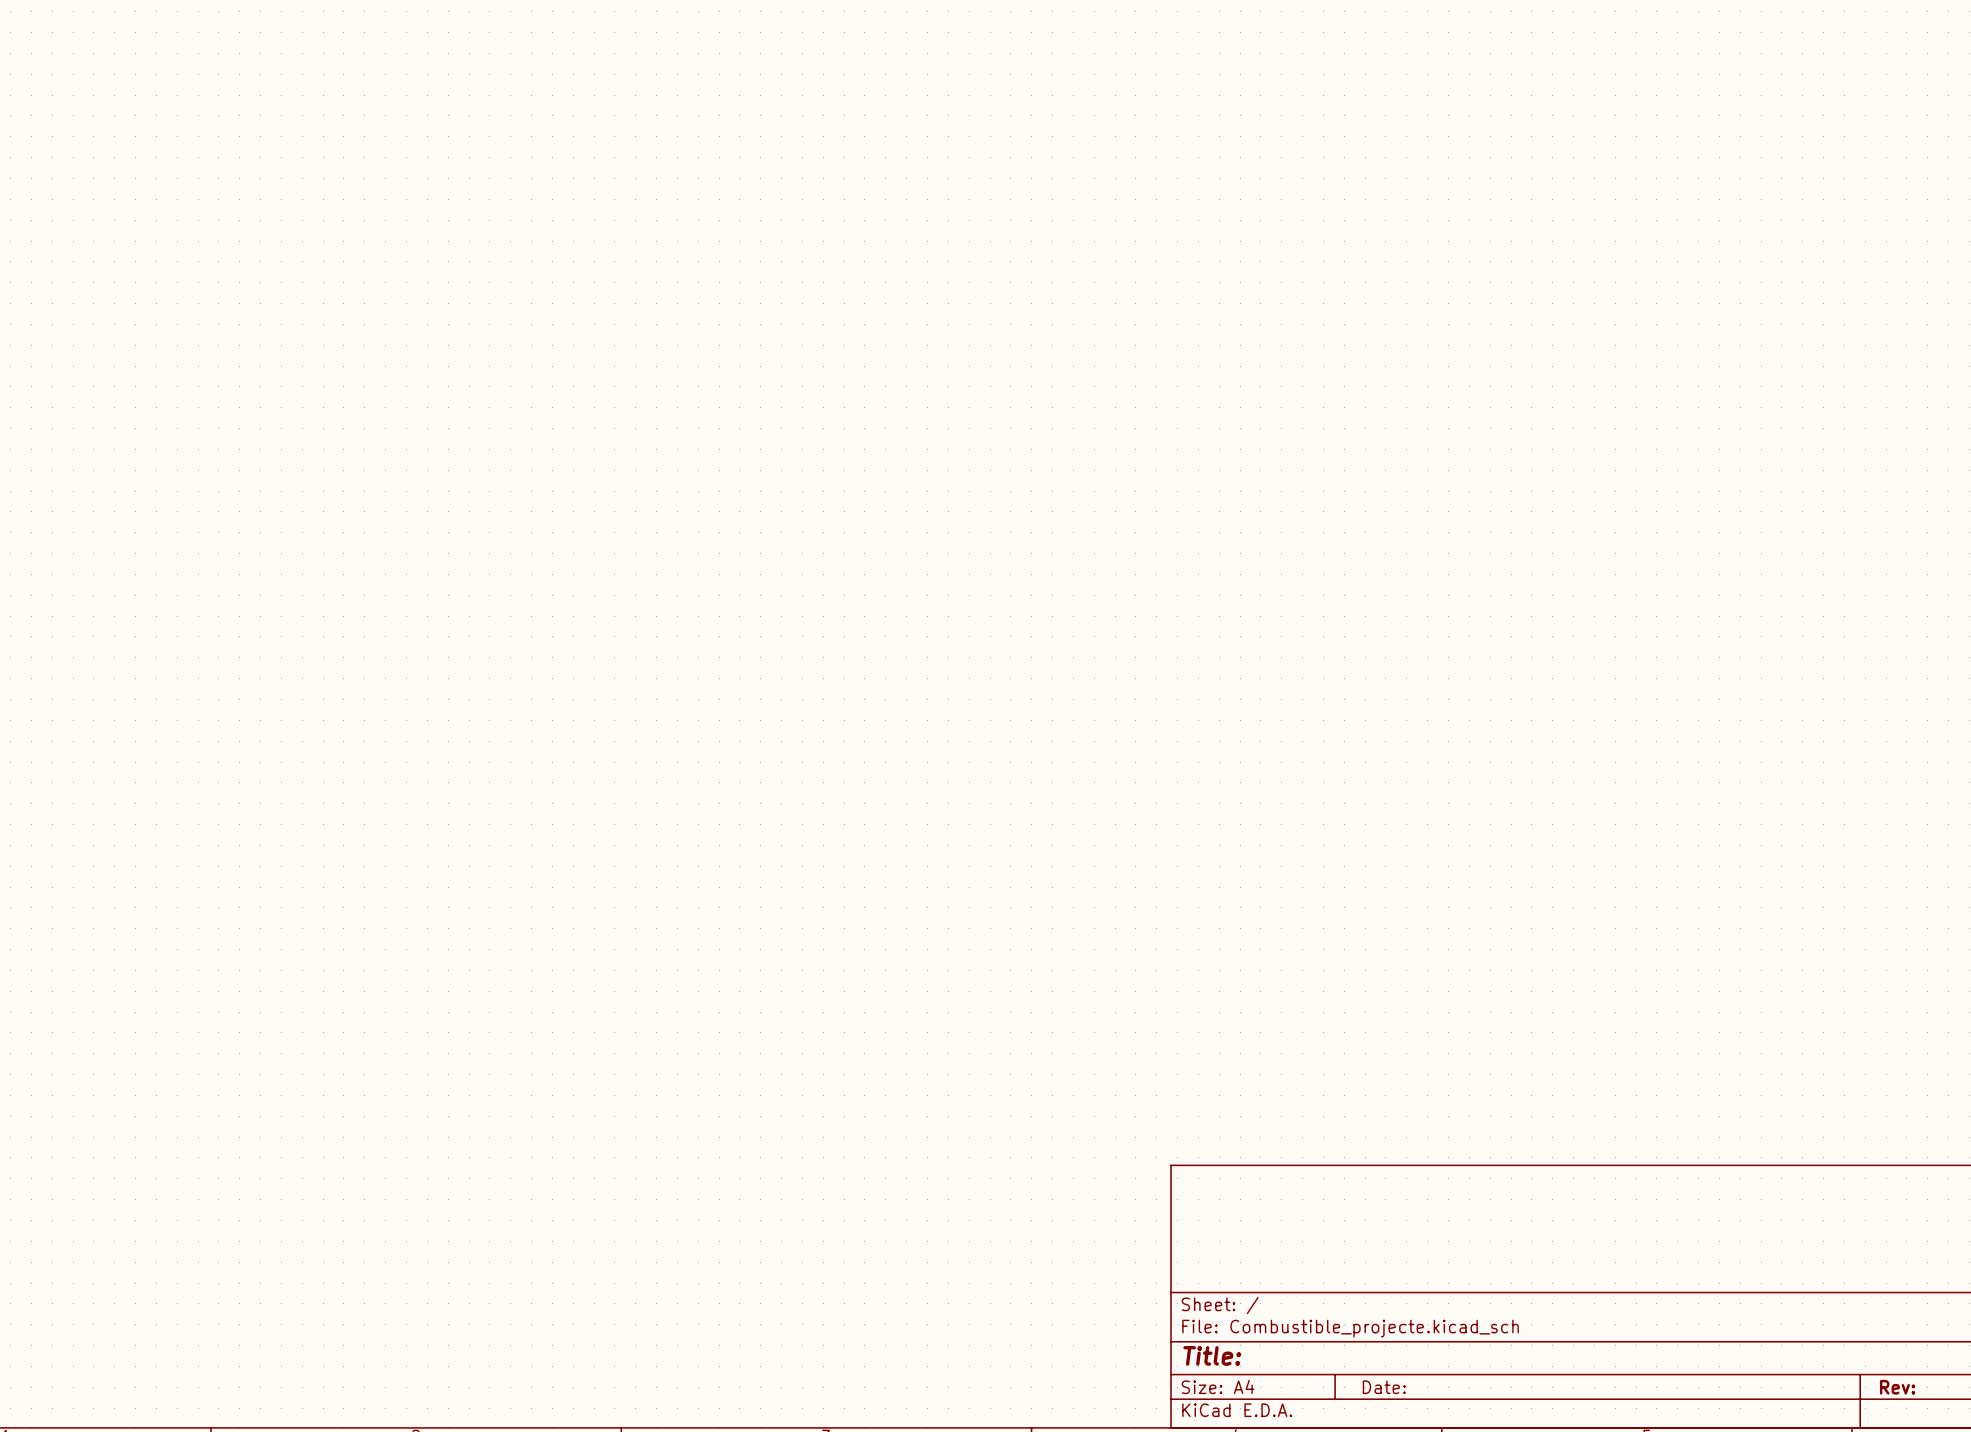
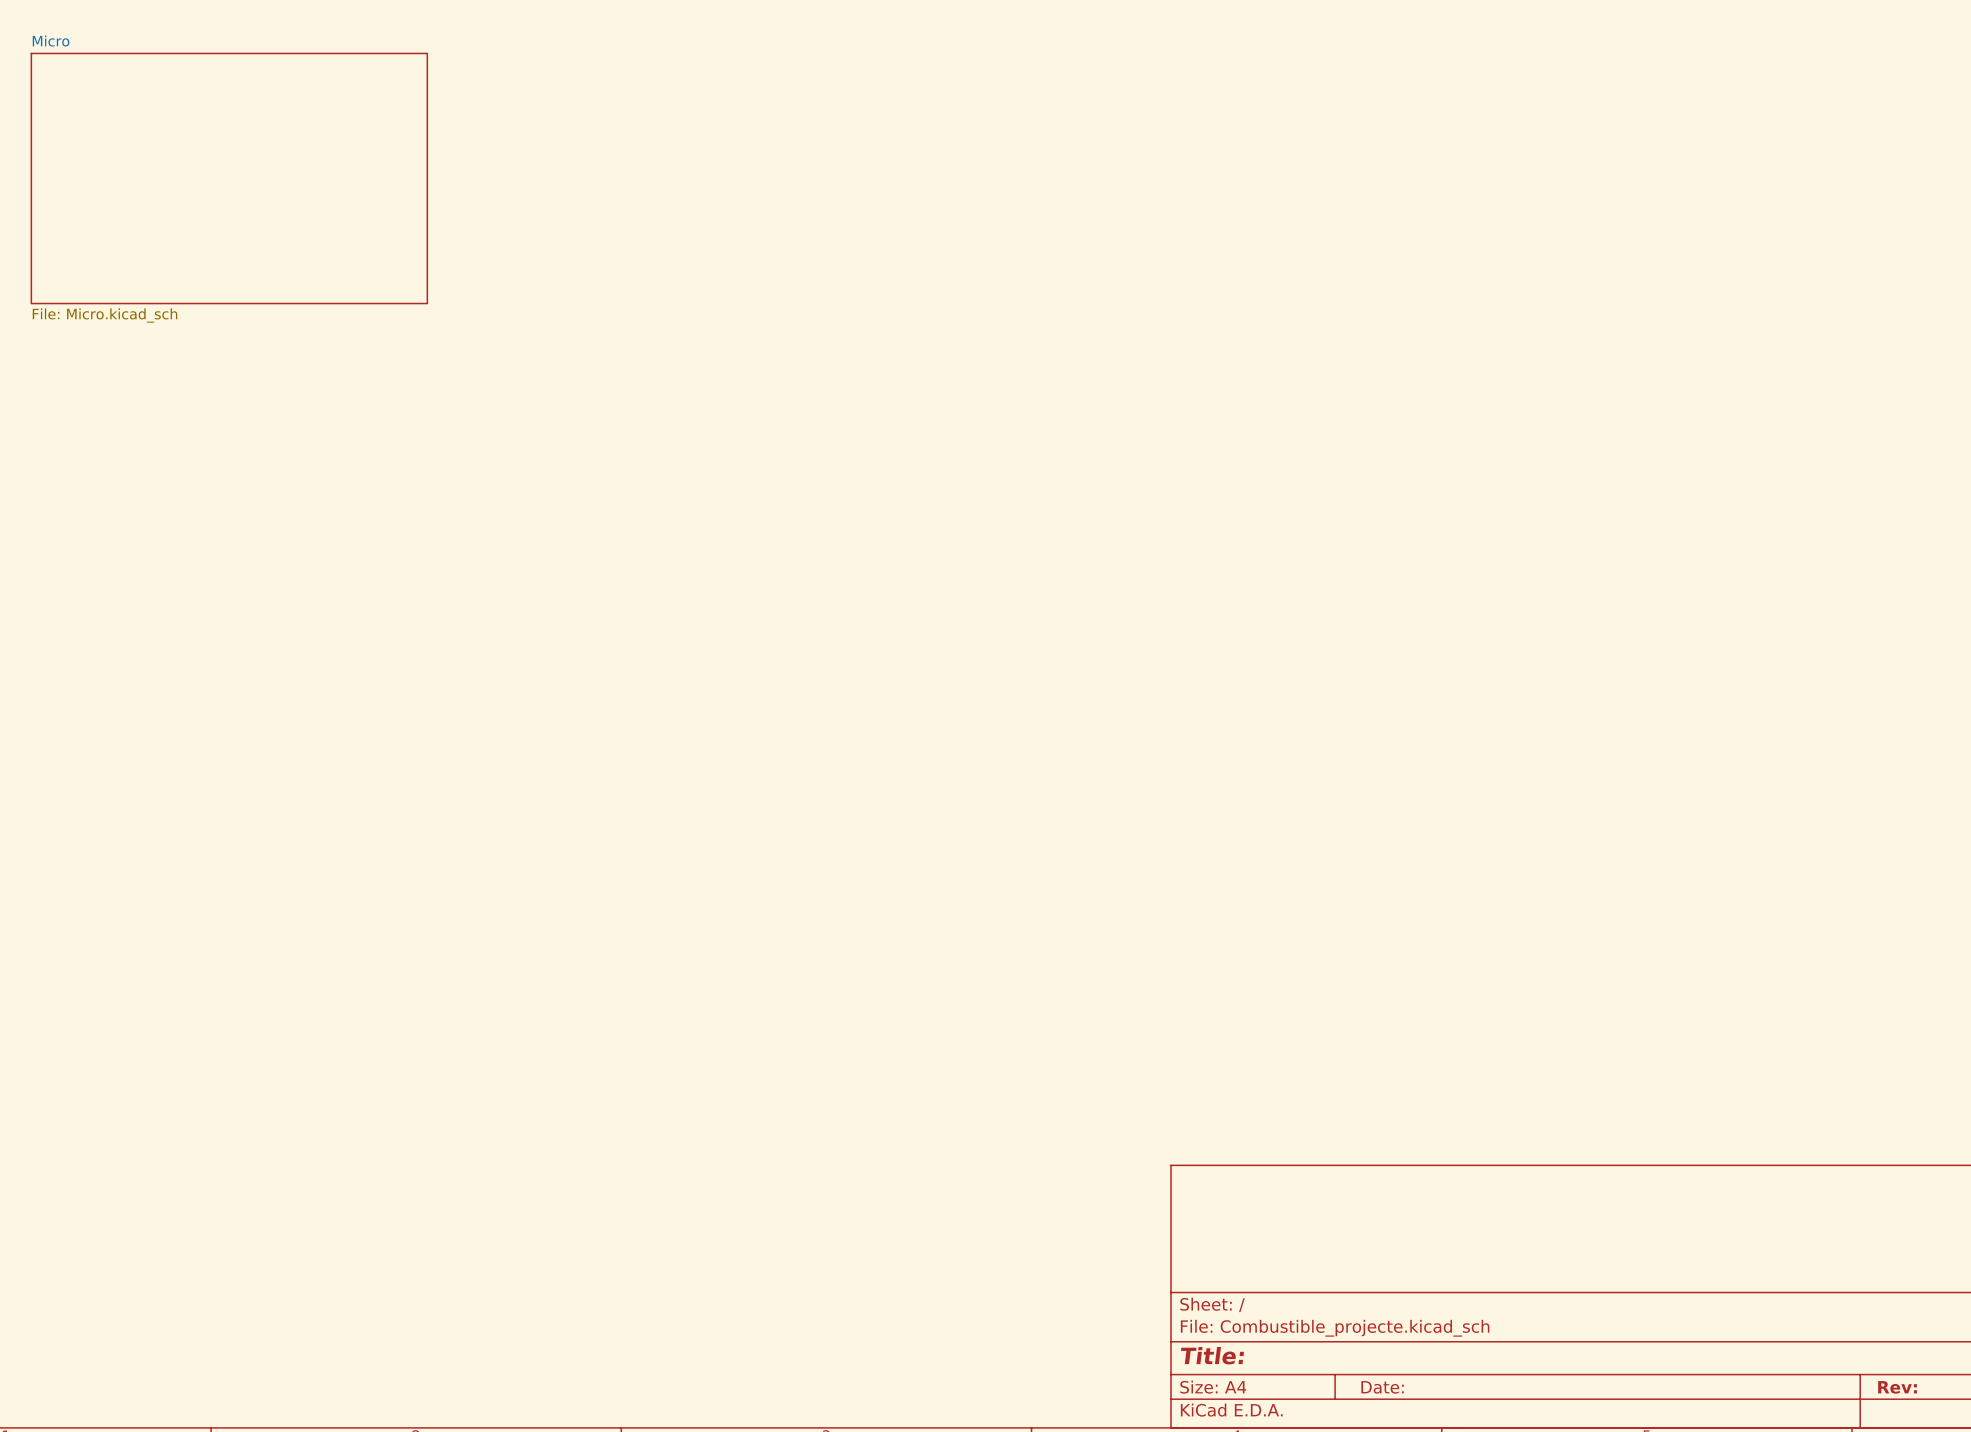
sheet Micro: none -> File: Micro.kicad_sch (229, 178)

